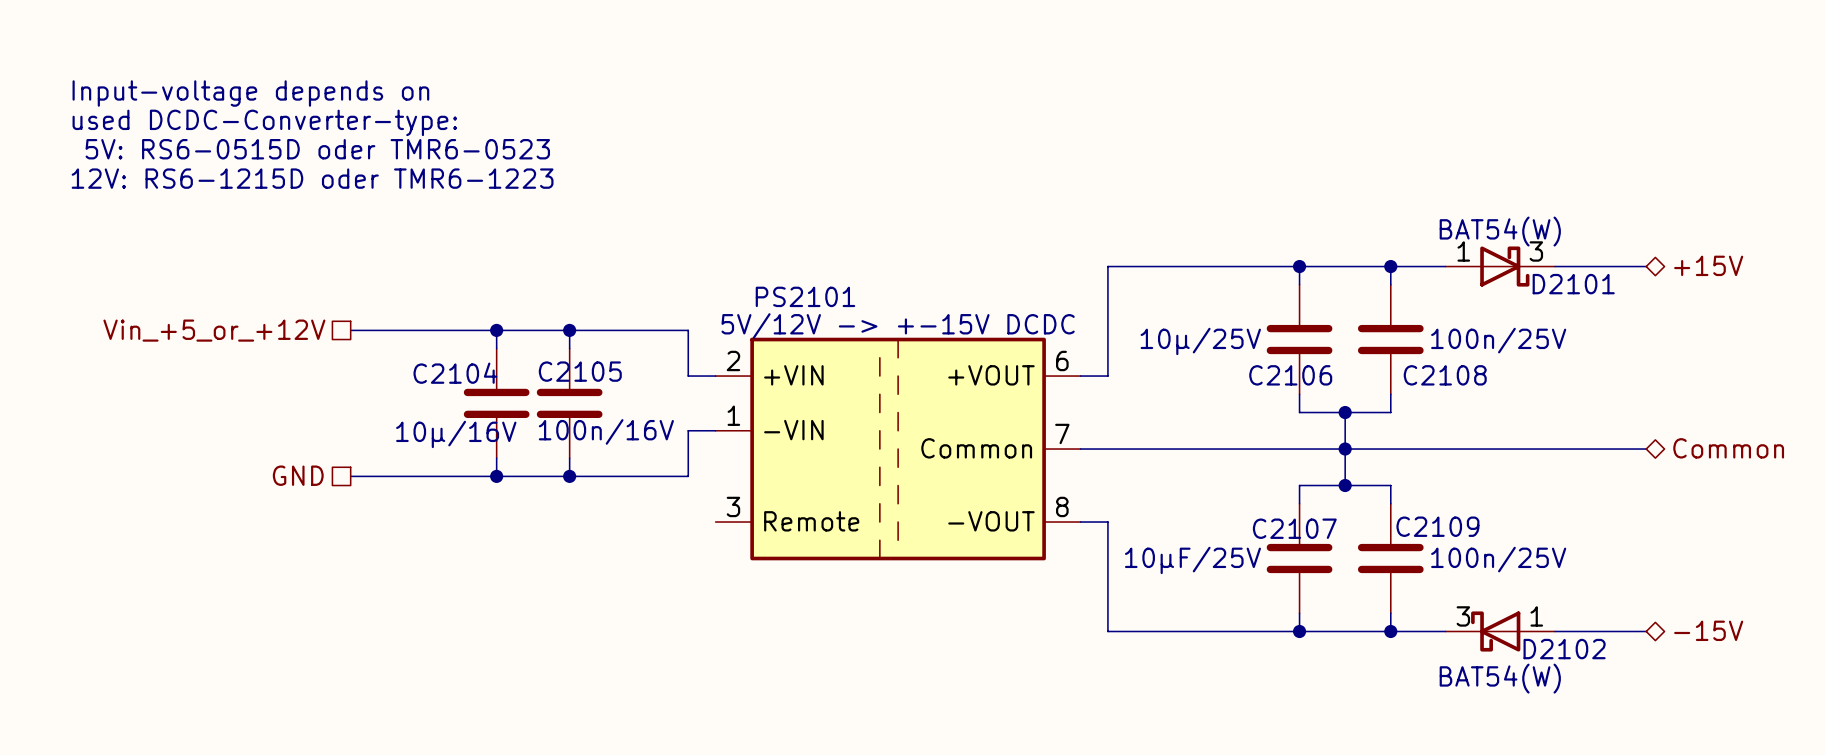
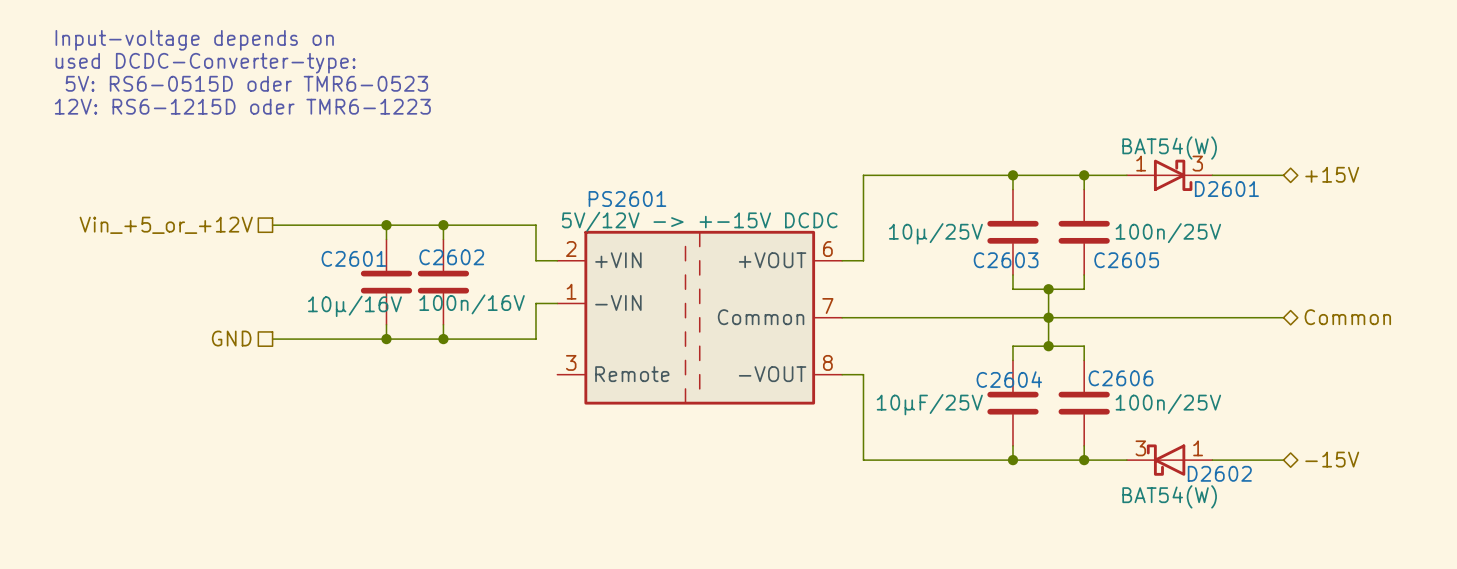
D2101 name: D2101 (1573, 284) -> D2601 (1226, 189)
PS2101 name: PS2101 (805, 296) -> PS2601 (627, 199)
C2105 name: C2105 (580, 371) -> C2602 (451, 257)
C2104 name: C2104 (455, 373) -> C2601 (353, 258)
C2106 name: C2106 (1290, 375) -> C2603 (1006, 260)
C2108 name: C2108 (1445, 375) -> C2605 (1126, 260)
C2109 name: C2109 (1437, 526) -> C2606 (1120, 378)
C2107 name: C2107 (1294, 528) -> C2604 (1009, 379)
D2102 name: D2102 (1564, 649) -> D2602 (1219, 473)

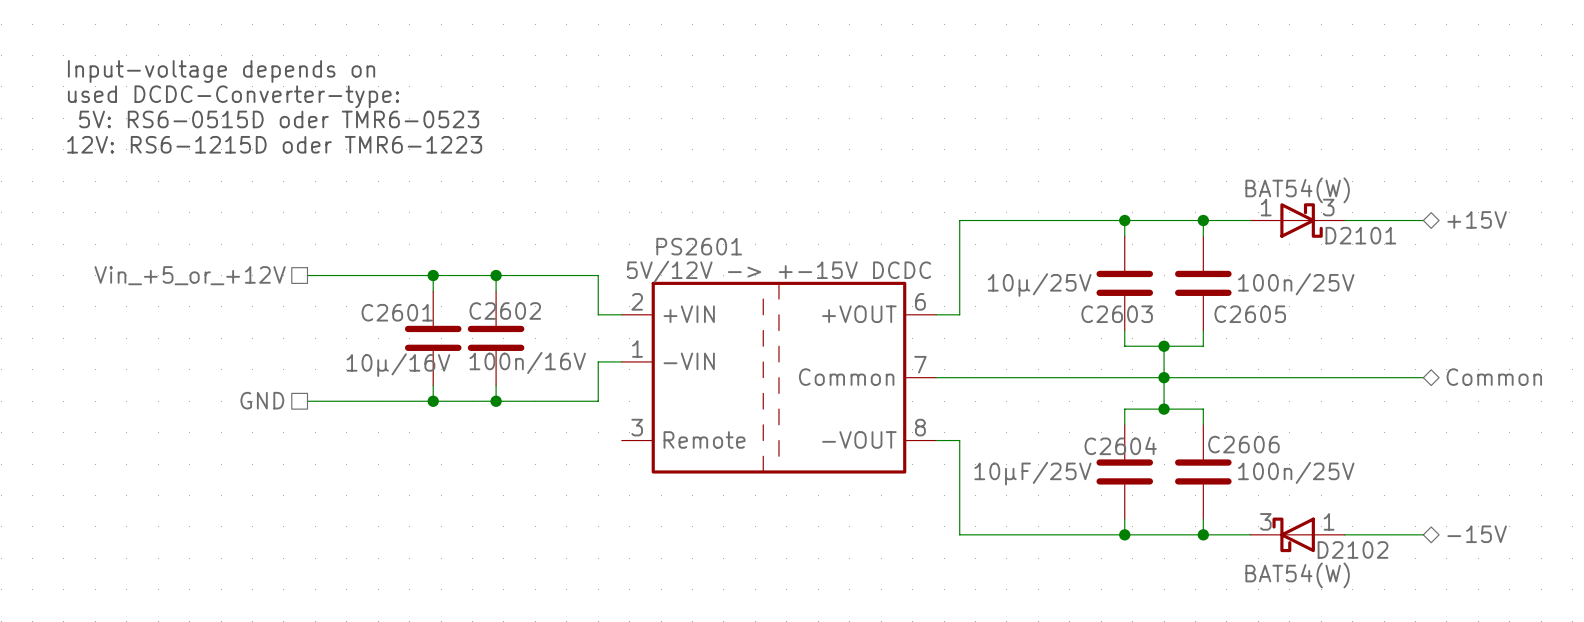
D2601 name: D2601 (1226, 189) -> D2101 (1360, 235)
D2602 name: D2602 (1219, 473) -> D2102 (1353, 549)

